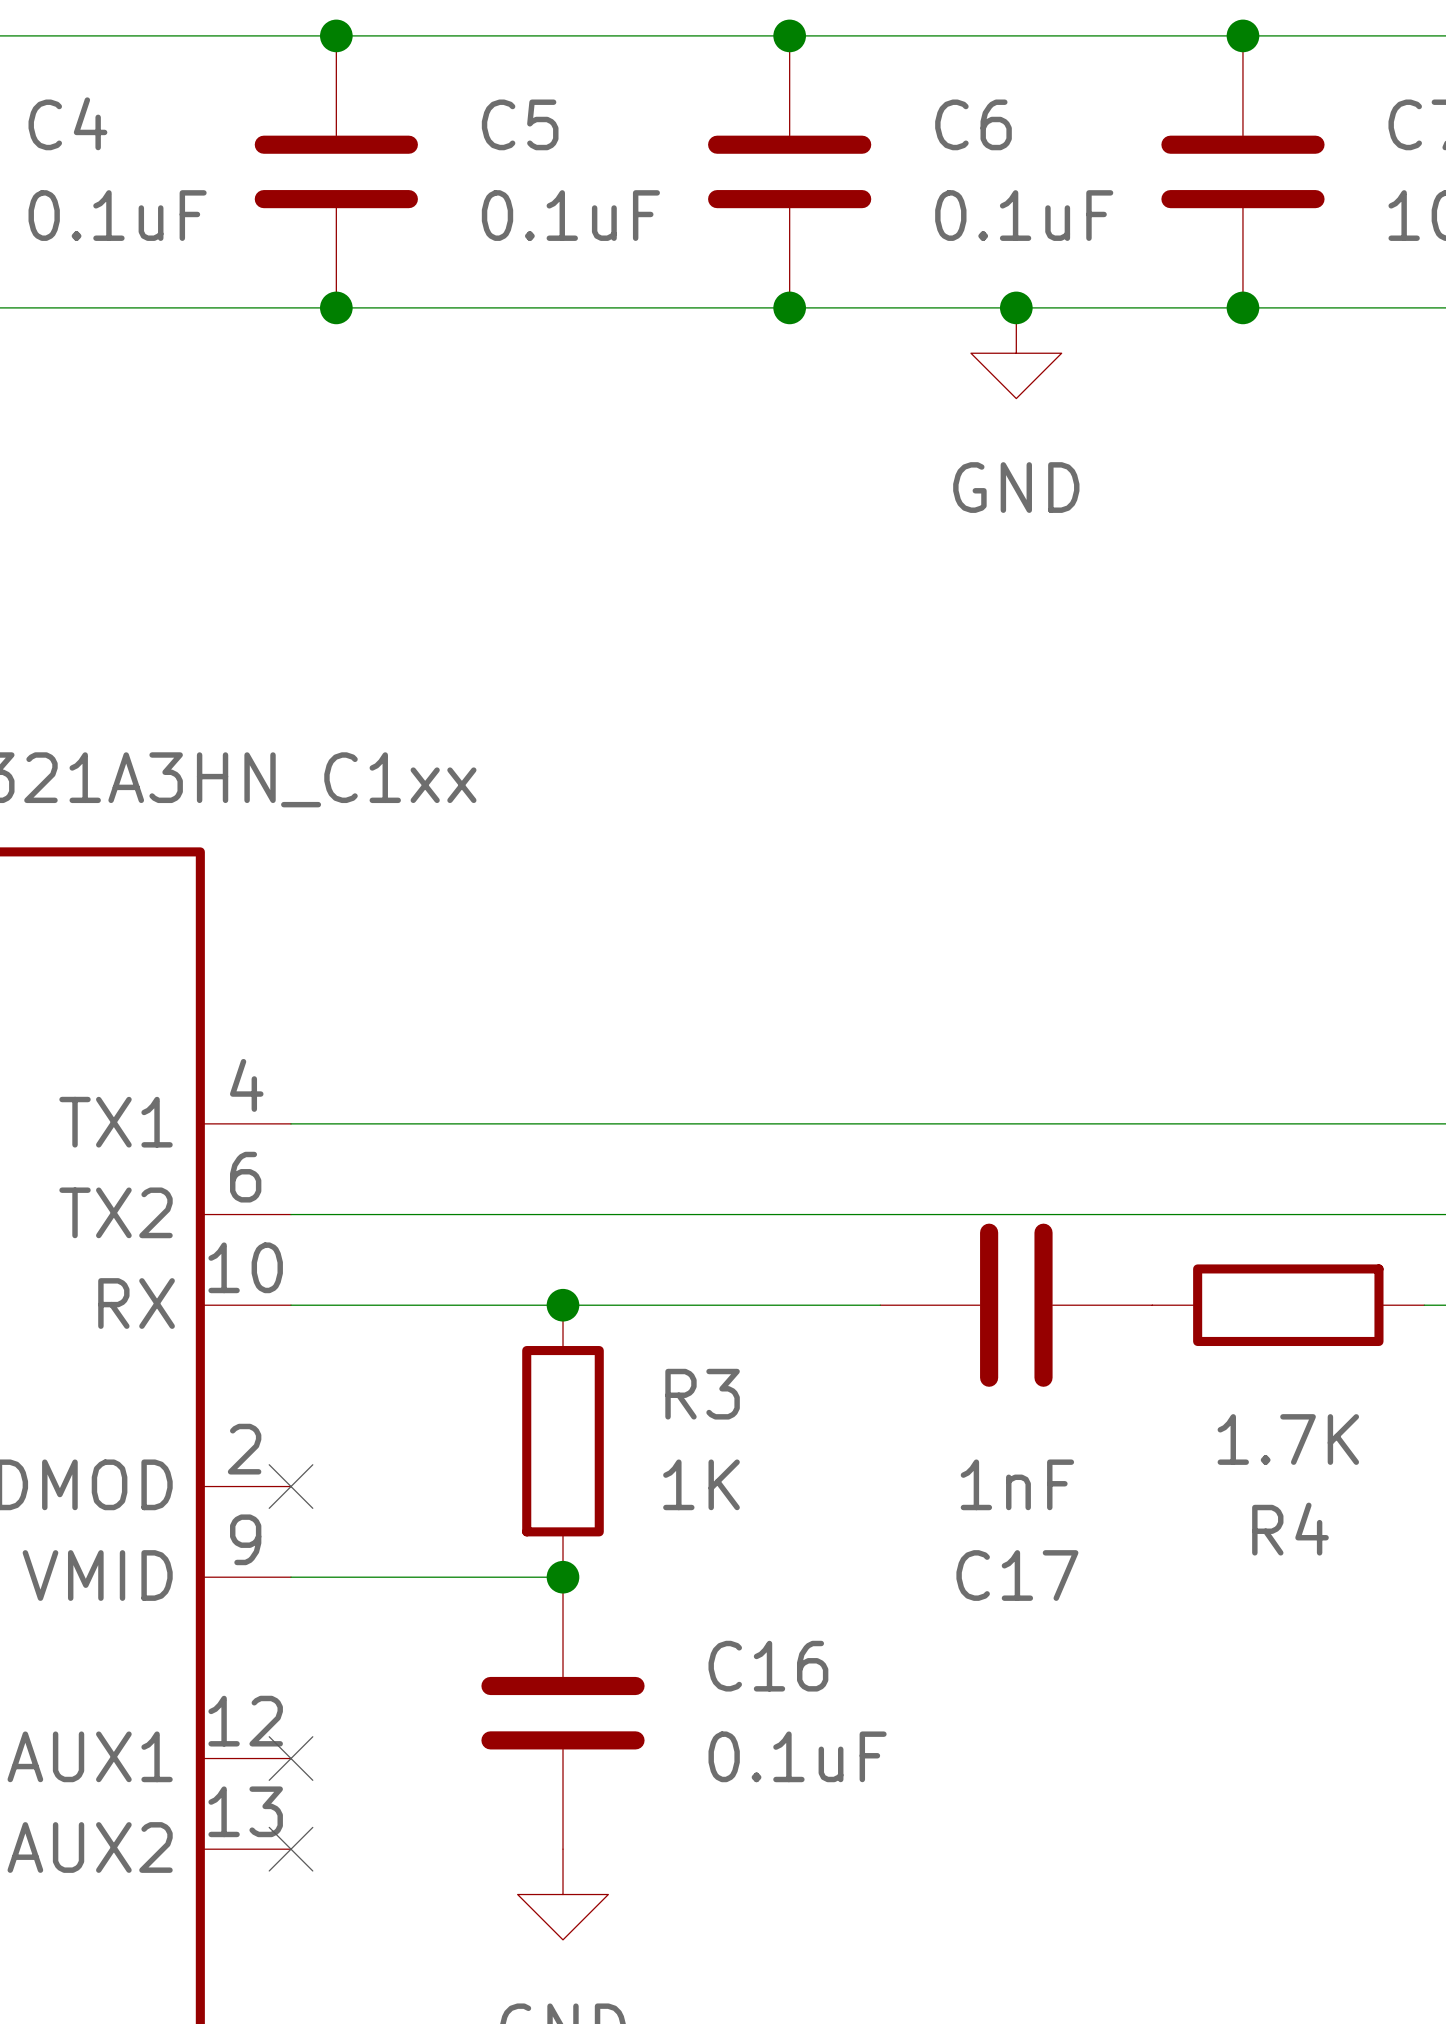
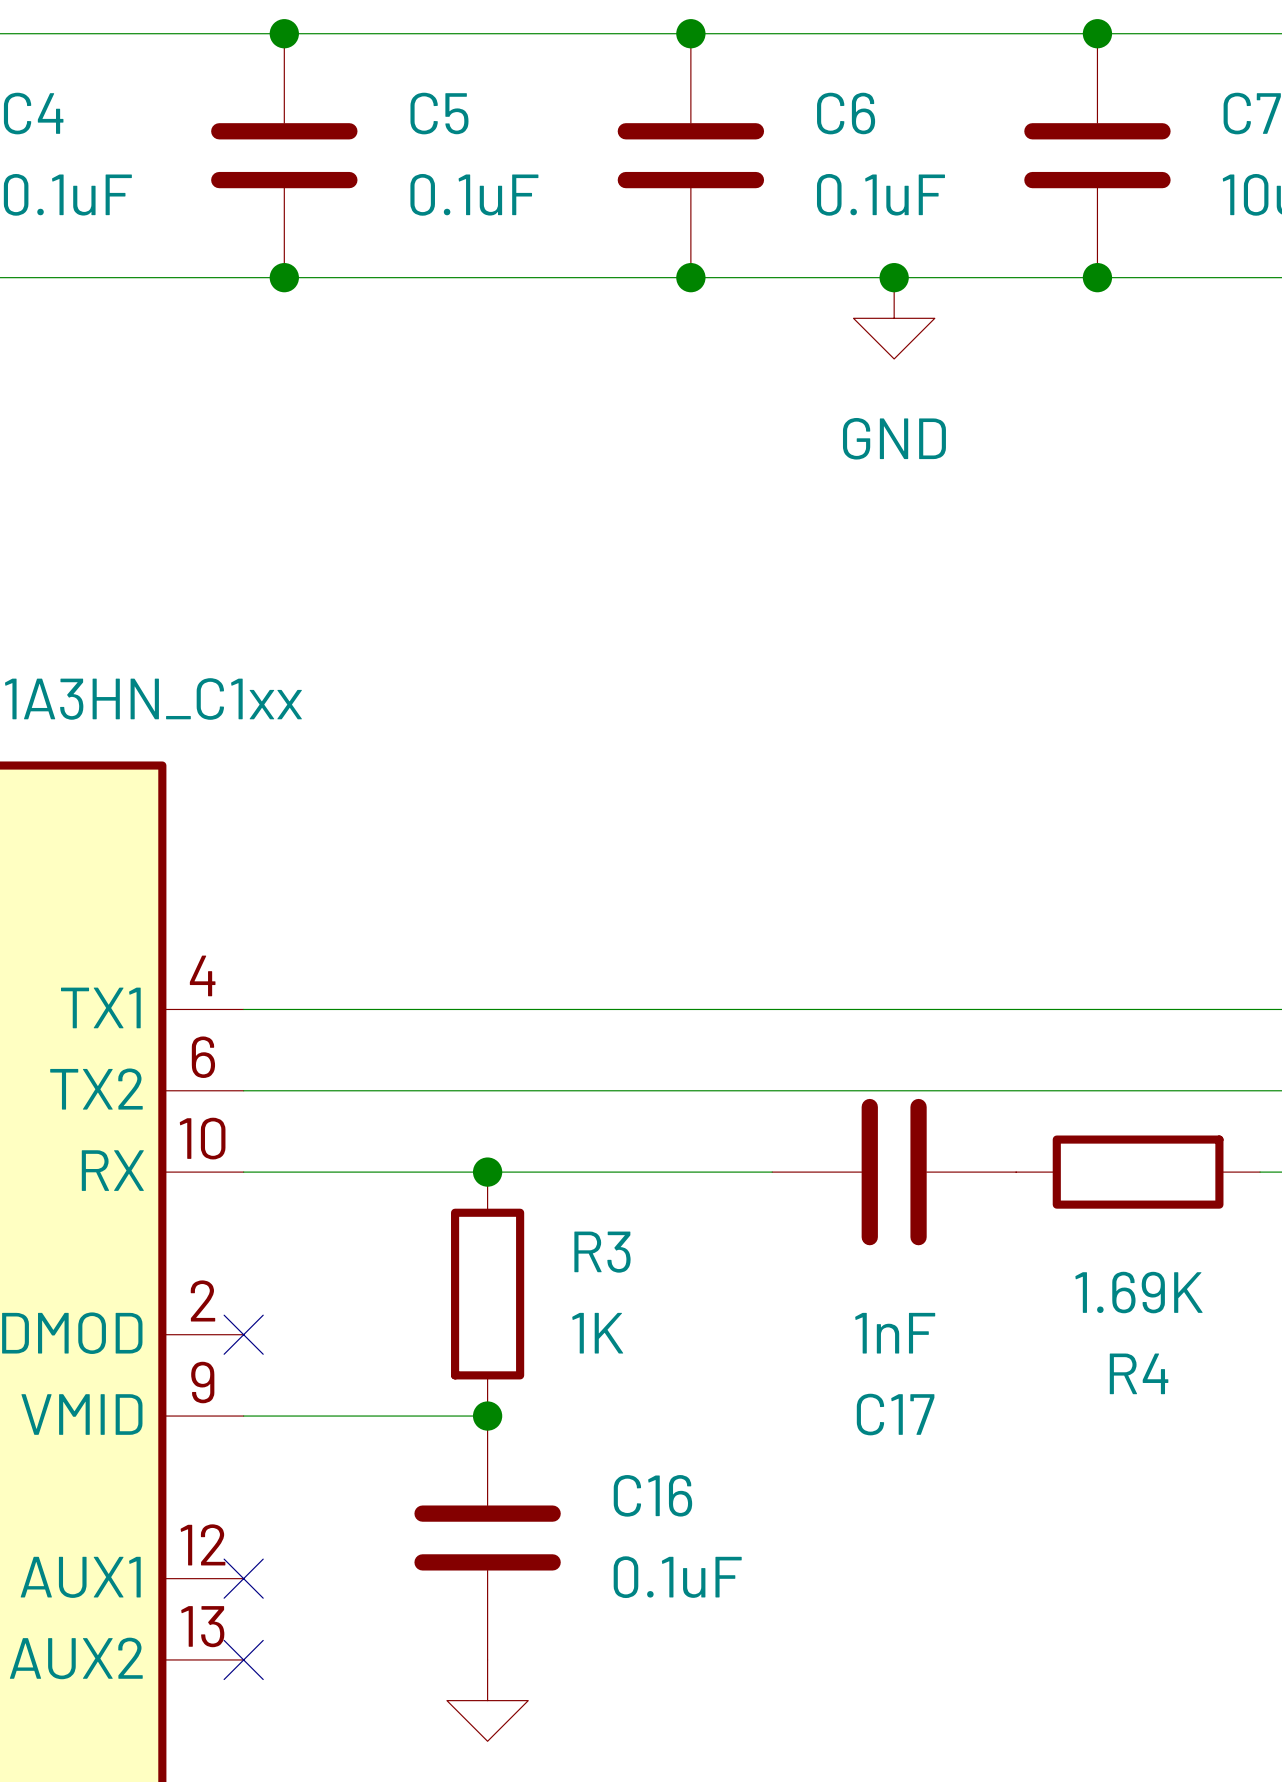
R4 value: 1.7K (1288, 1439) -> 1.69K (1139, 1292)

